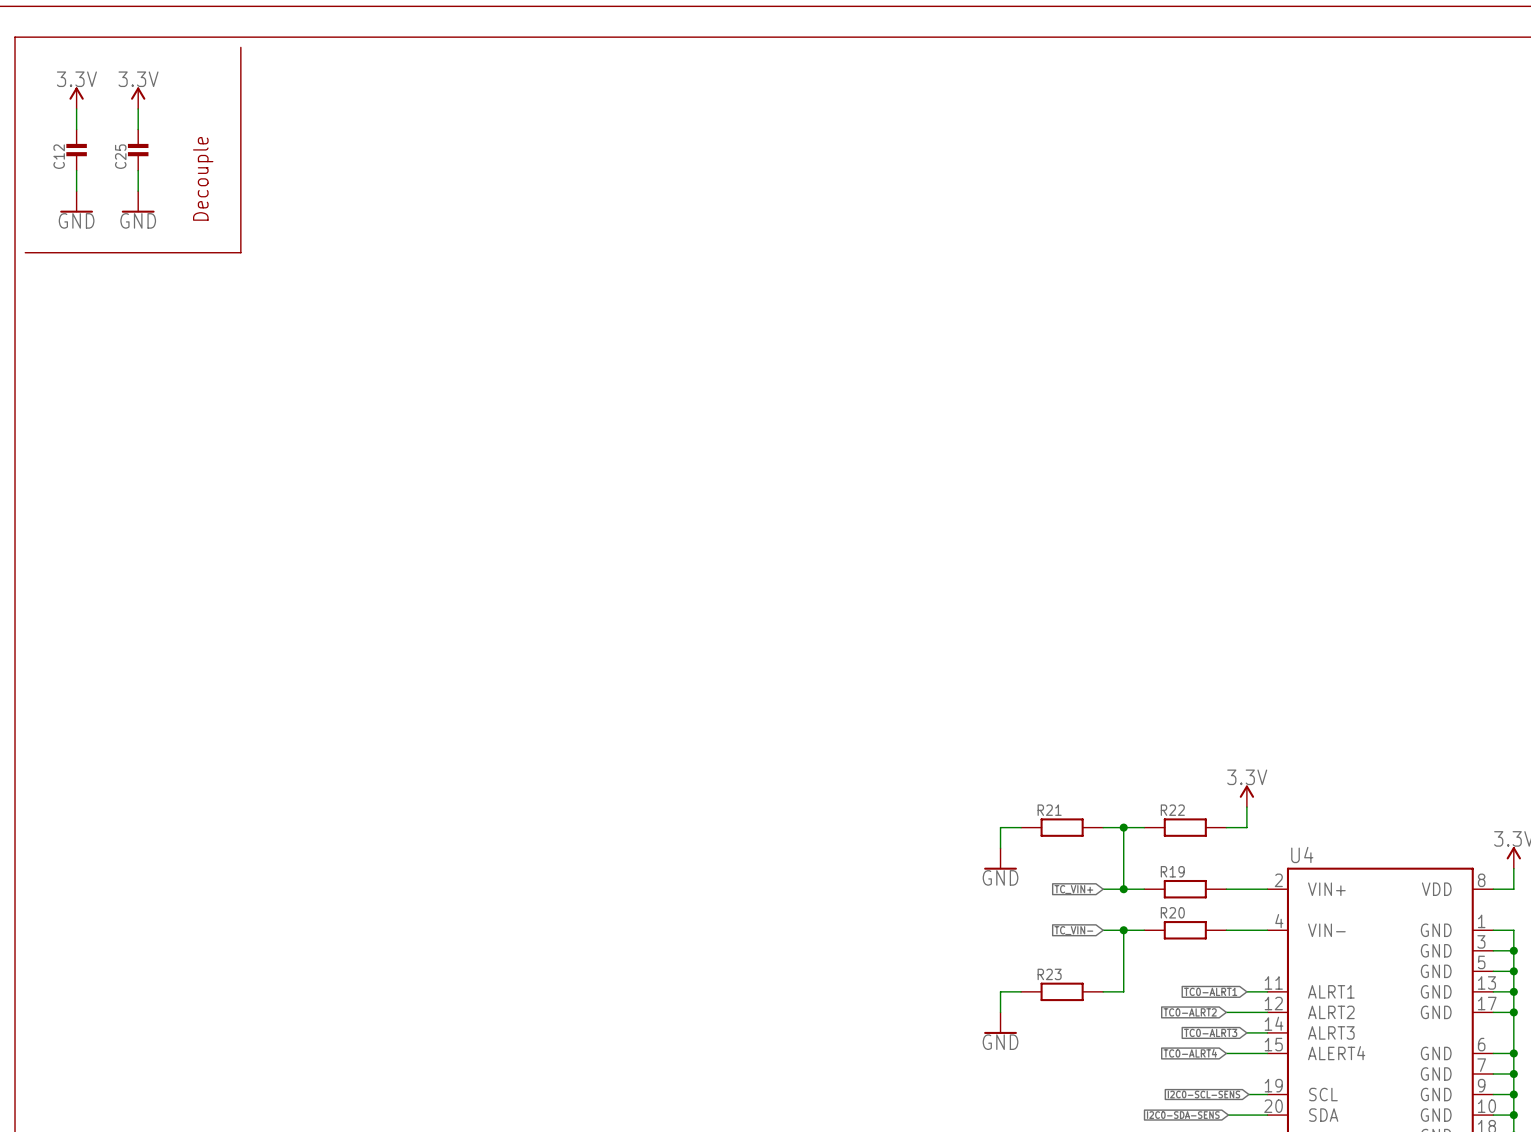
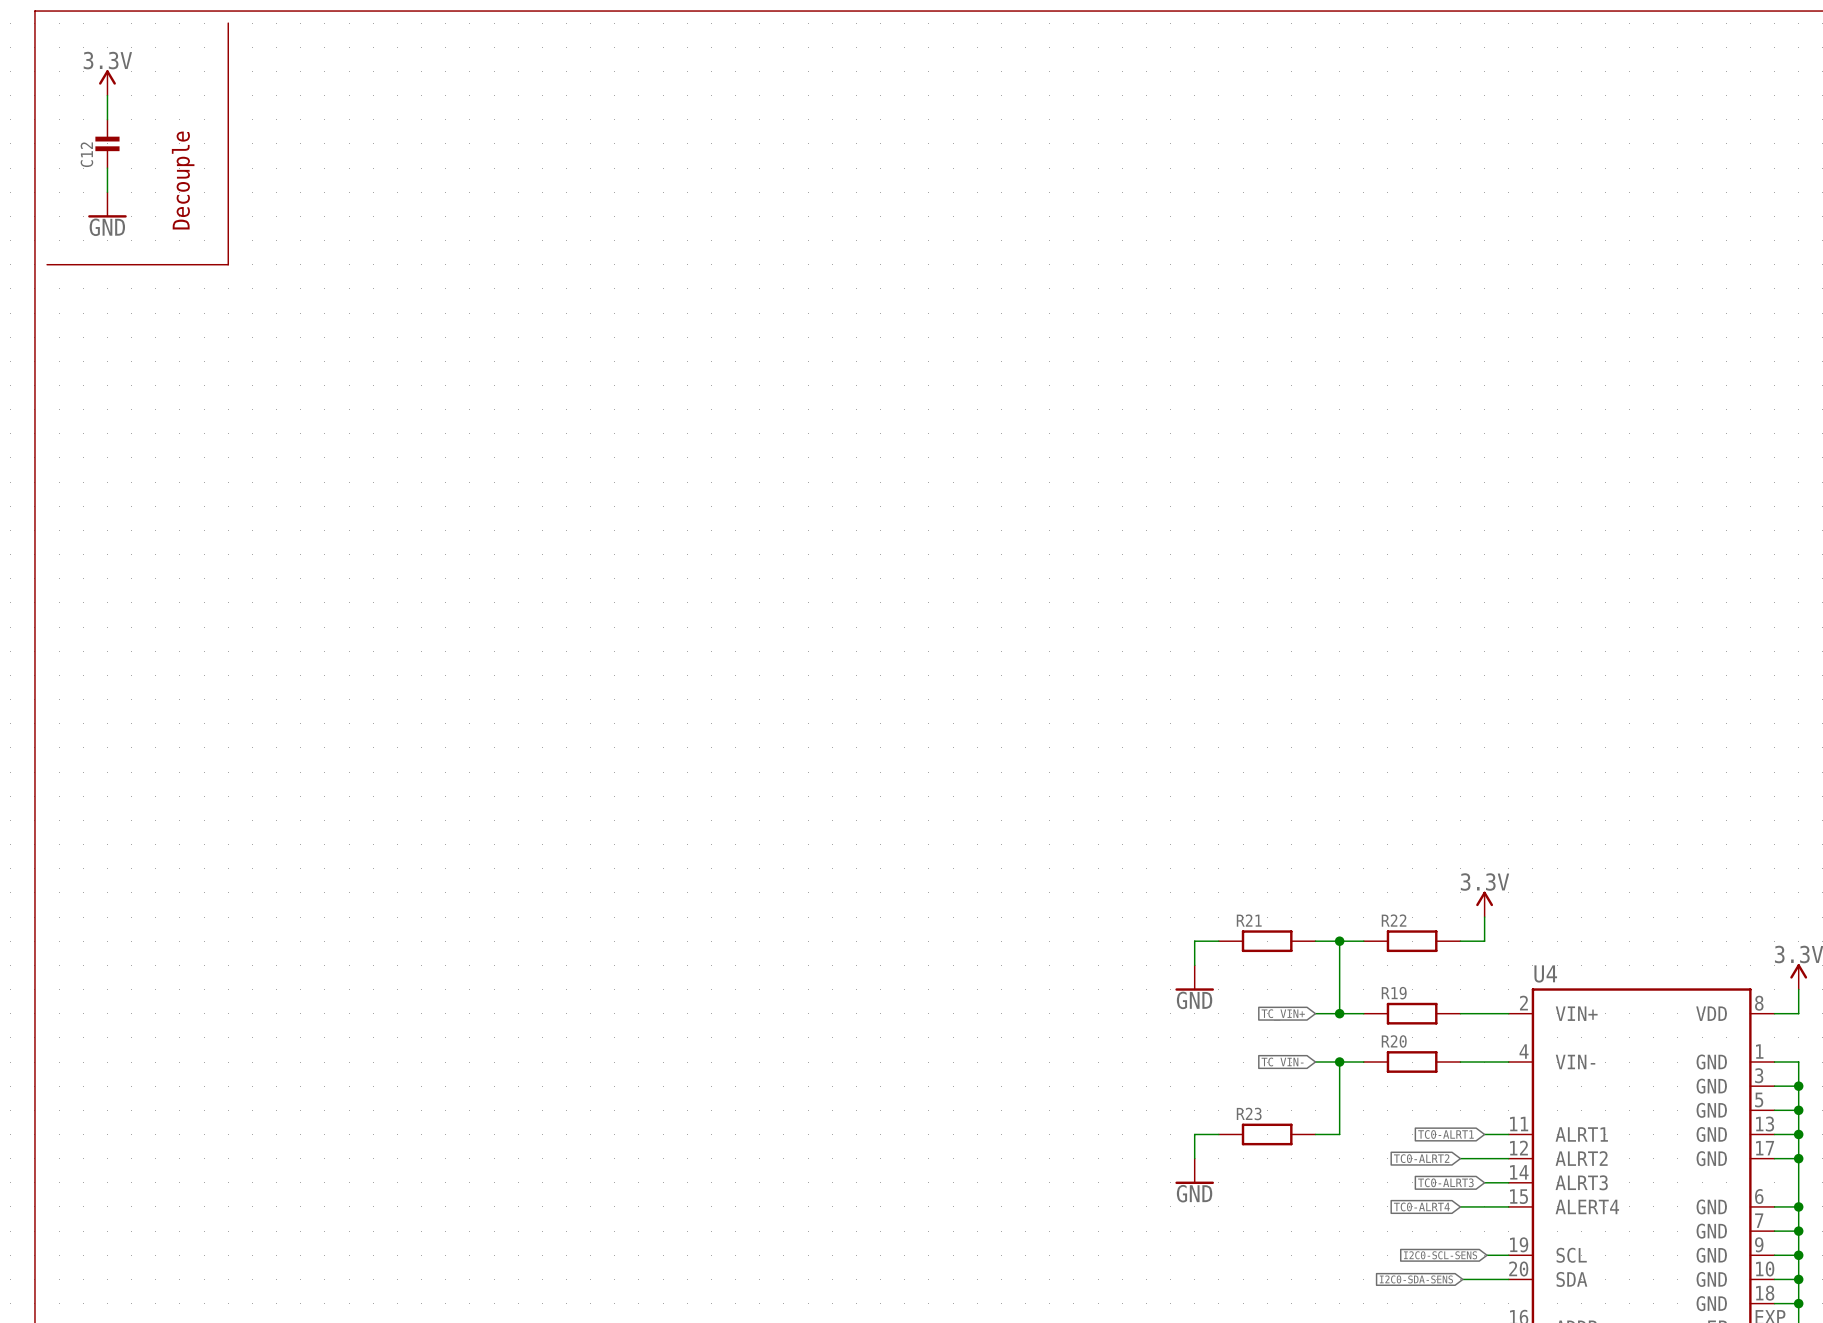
line: (240, 47) (240, 252) (179, 252) -> (228, 23) (228, 264)
power symbol: 3.3V (138, 98) -> none
wire: (138, 109) (138, 129) -> none
C25: (138, 150) -> none
wire: (138, 170) (138, 191) -> none
text position: Decouple (203, 178) -> Decouple (183, 180)
power symbol: GND (138, 201) -> none

